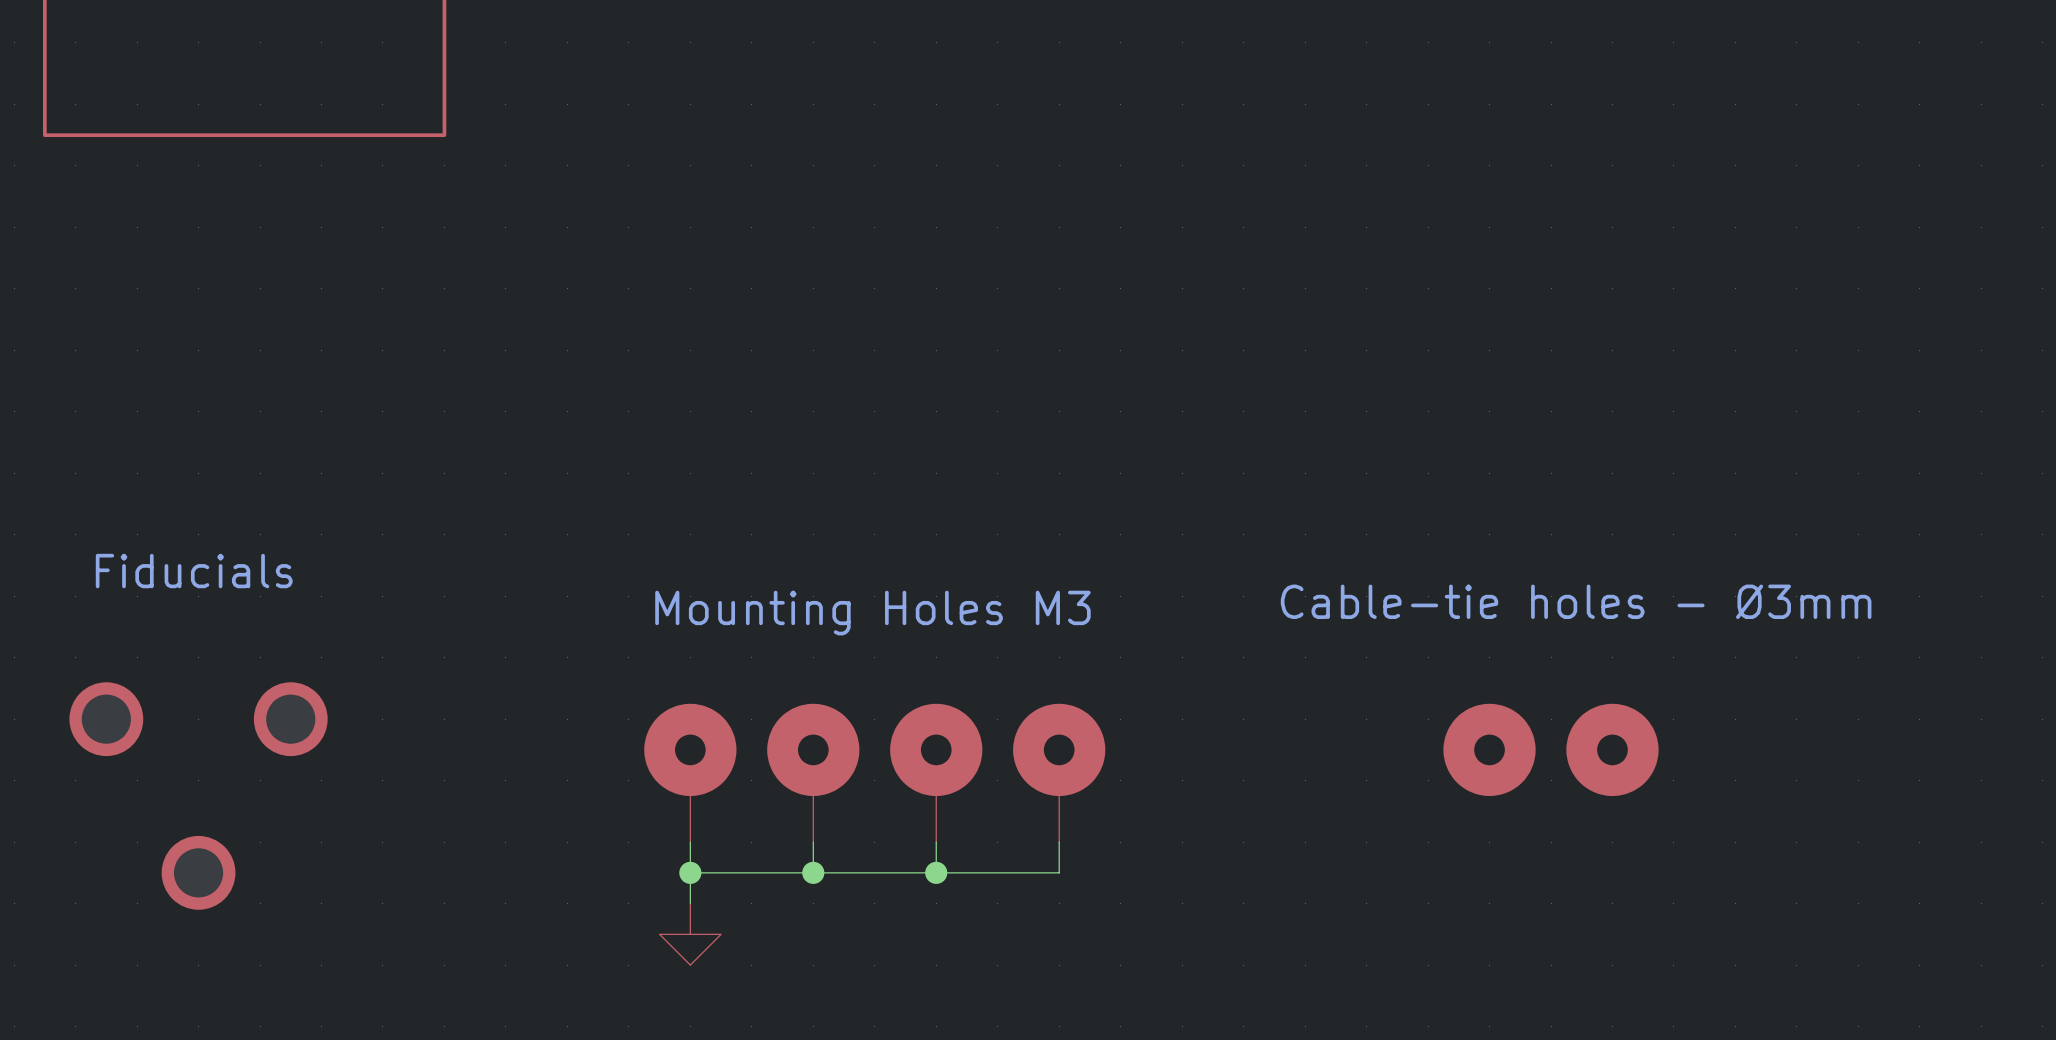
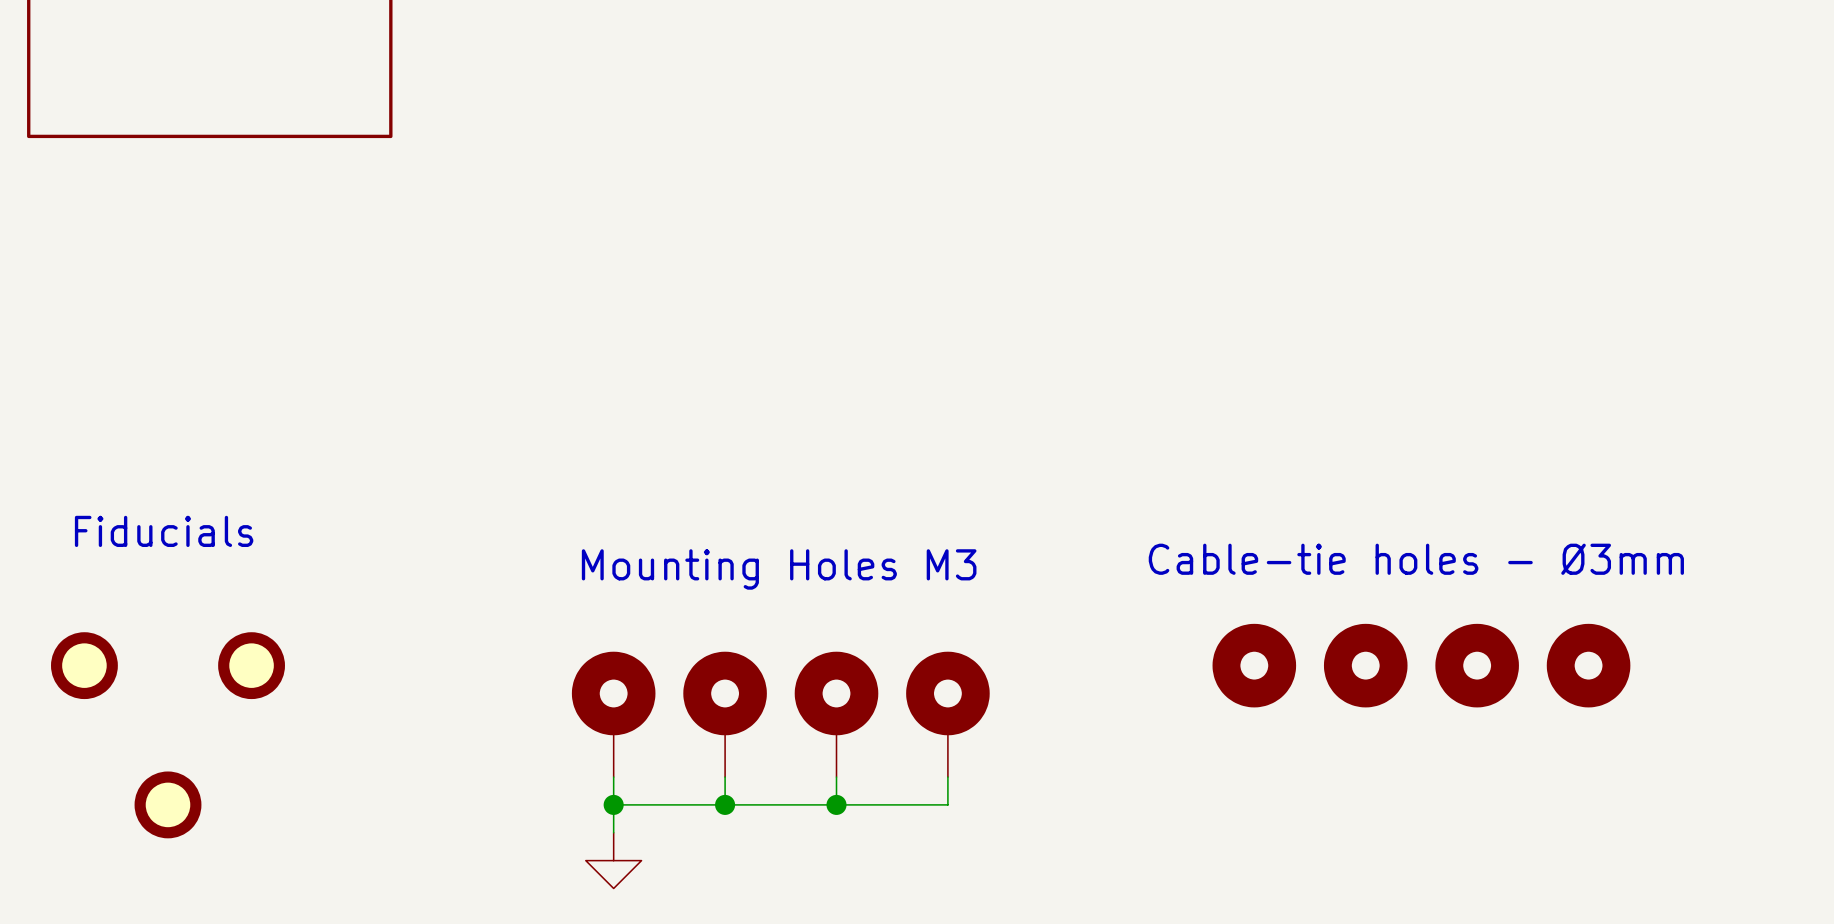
part: none -> (1254, 665)
part: none -> (1588, 665)
part position: (1489, 749) -> (1365, 665)
part position: (1612, 749) -> (1477, 665)

